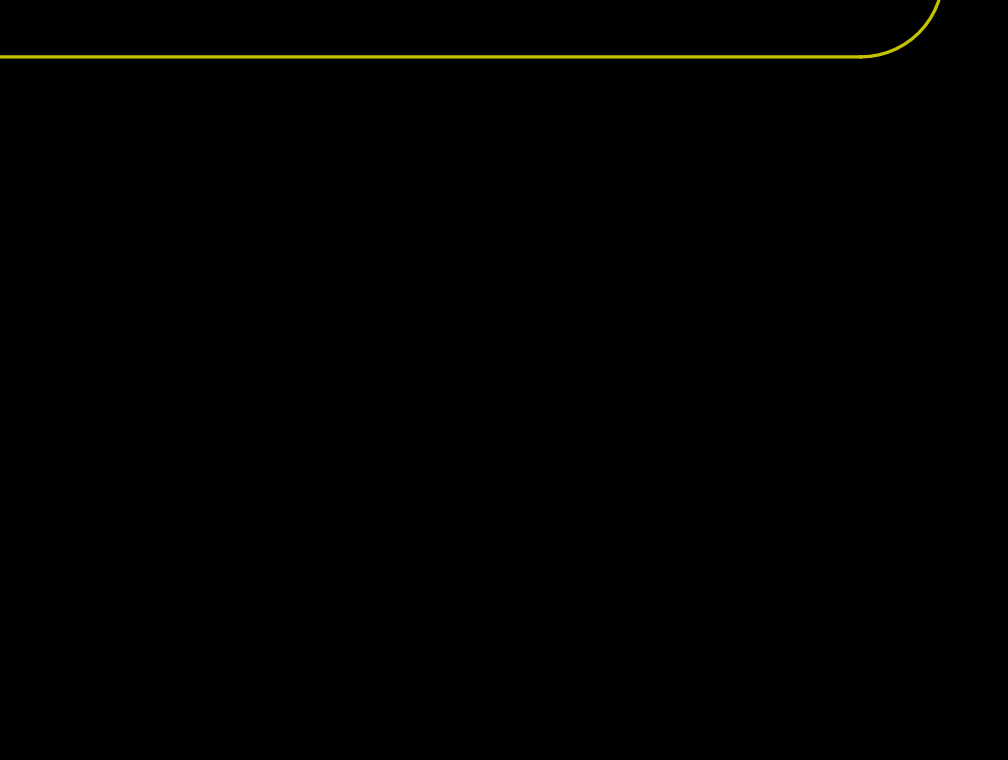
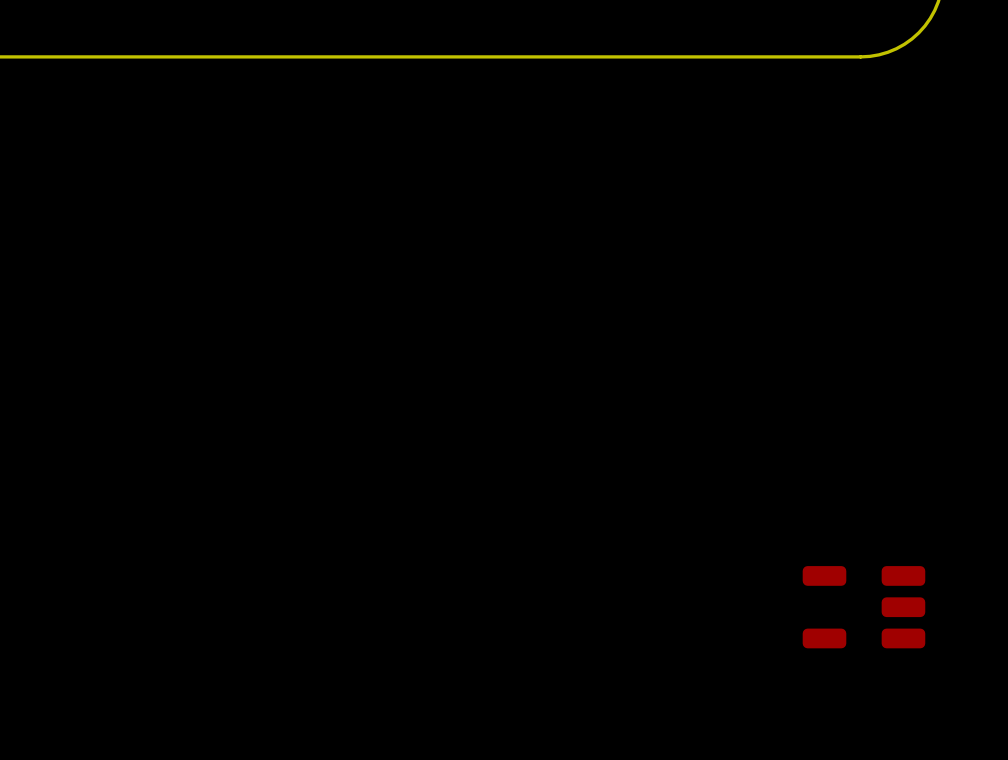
part: none -> (863, 607)

